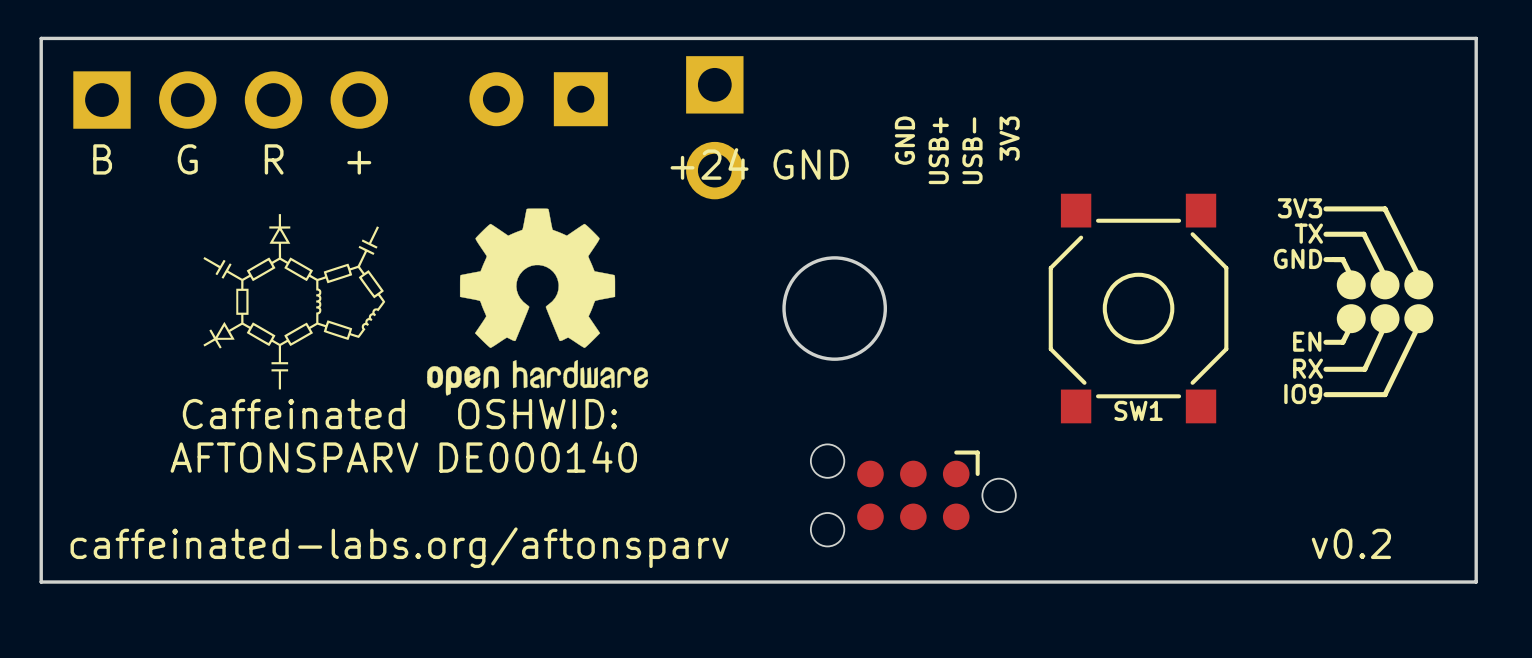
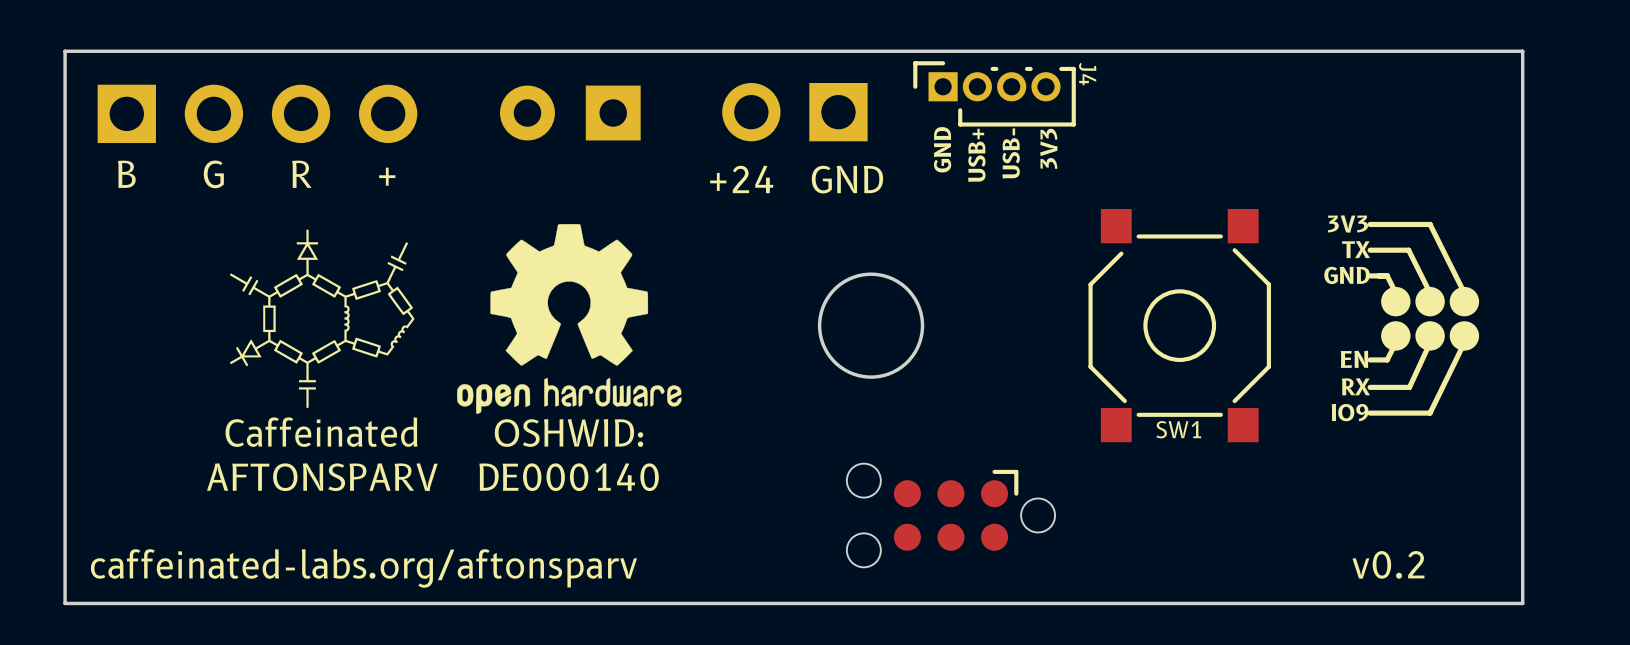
J4: none -> (994, 93)
part rotation: 0° (714, 127) -> 90° clockwise (794, 112)

